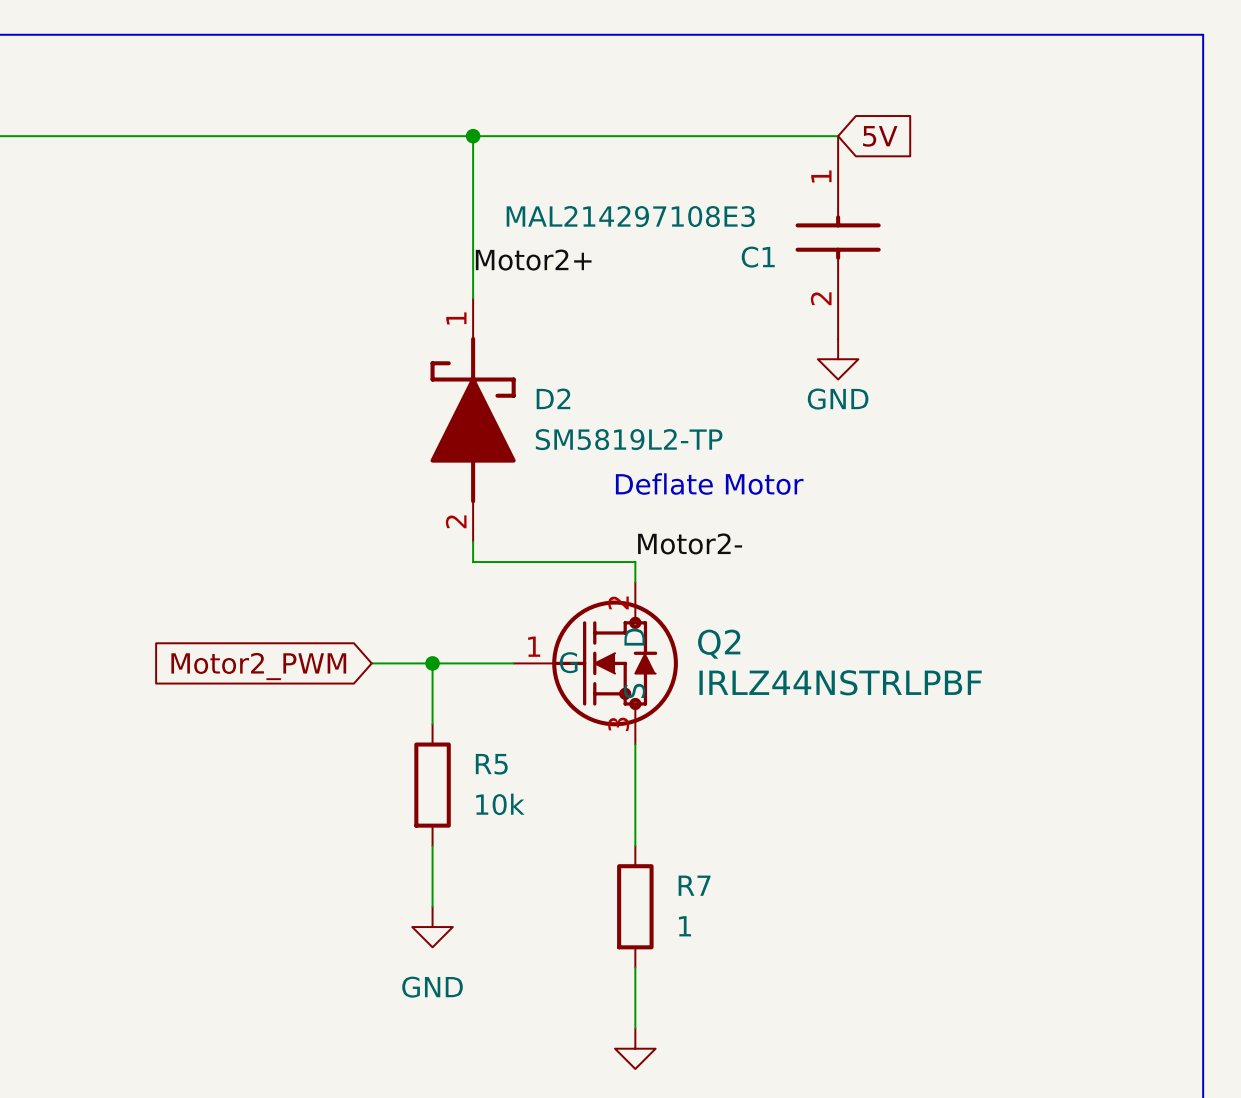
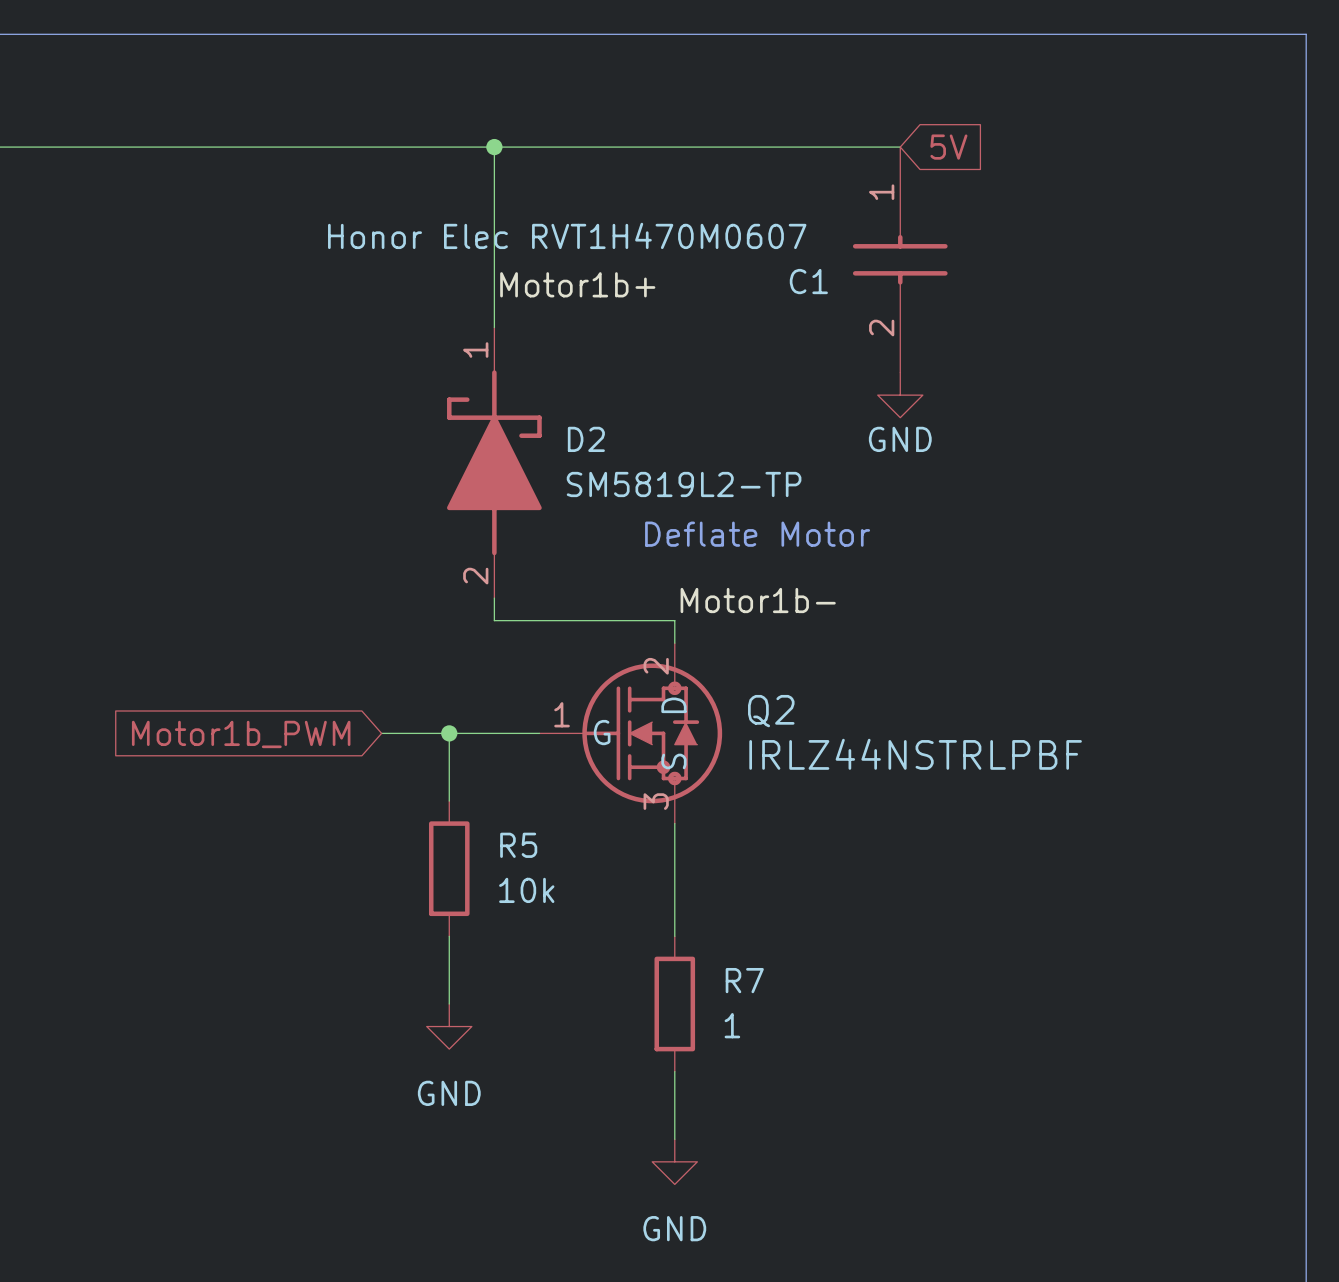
C1 value: MAL214297108E3 (630, 216) -> Honor Elec RVT1H470M0607 (567, 235)
label: Motor2+ (533, 260) -> Motor1b+ (577, 284)
label: Motor2- (690, 543) -> Motor1b- (758, 600)
global label: Motor2_PWM (258, 666) -> Motor1b_PWM (241, 734)

